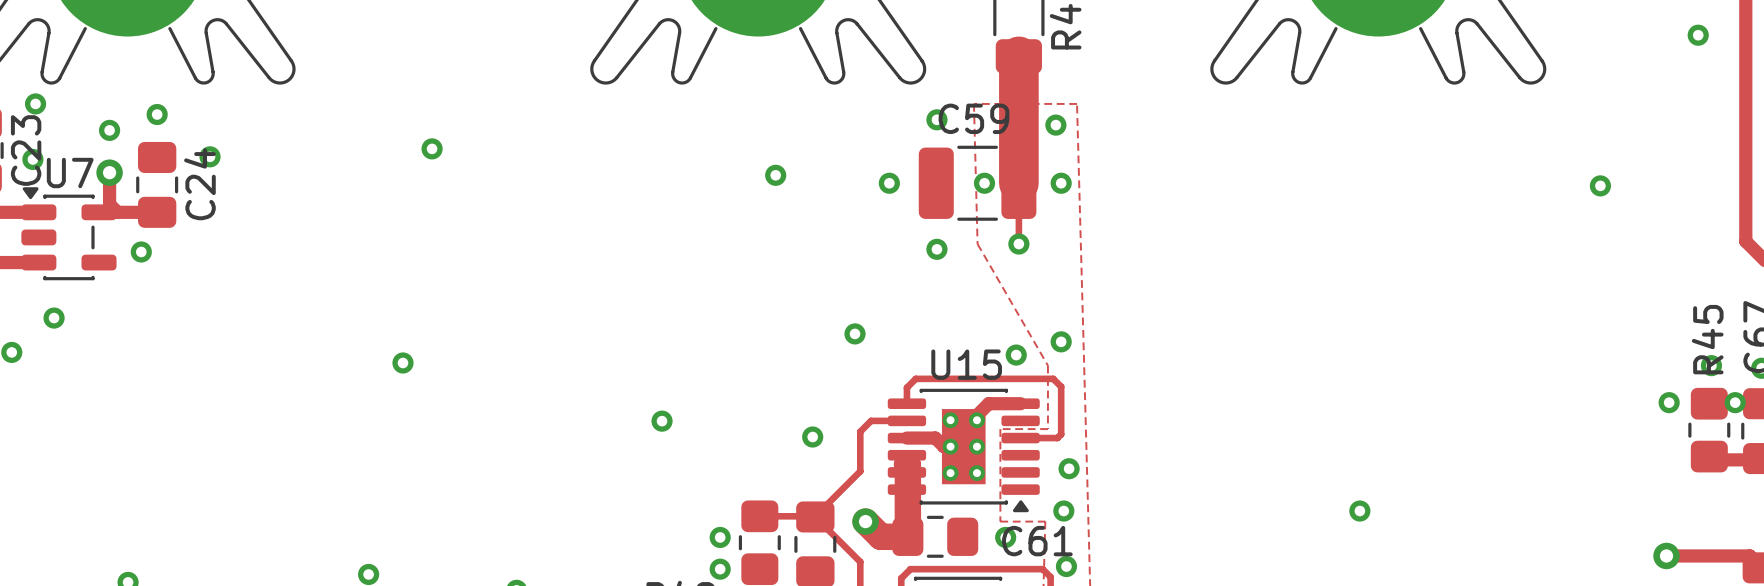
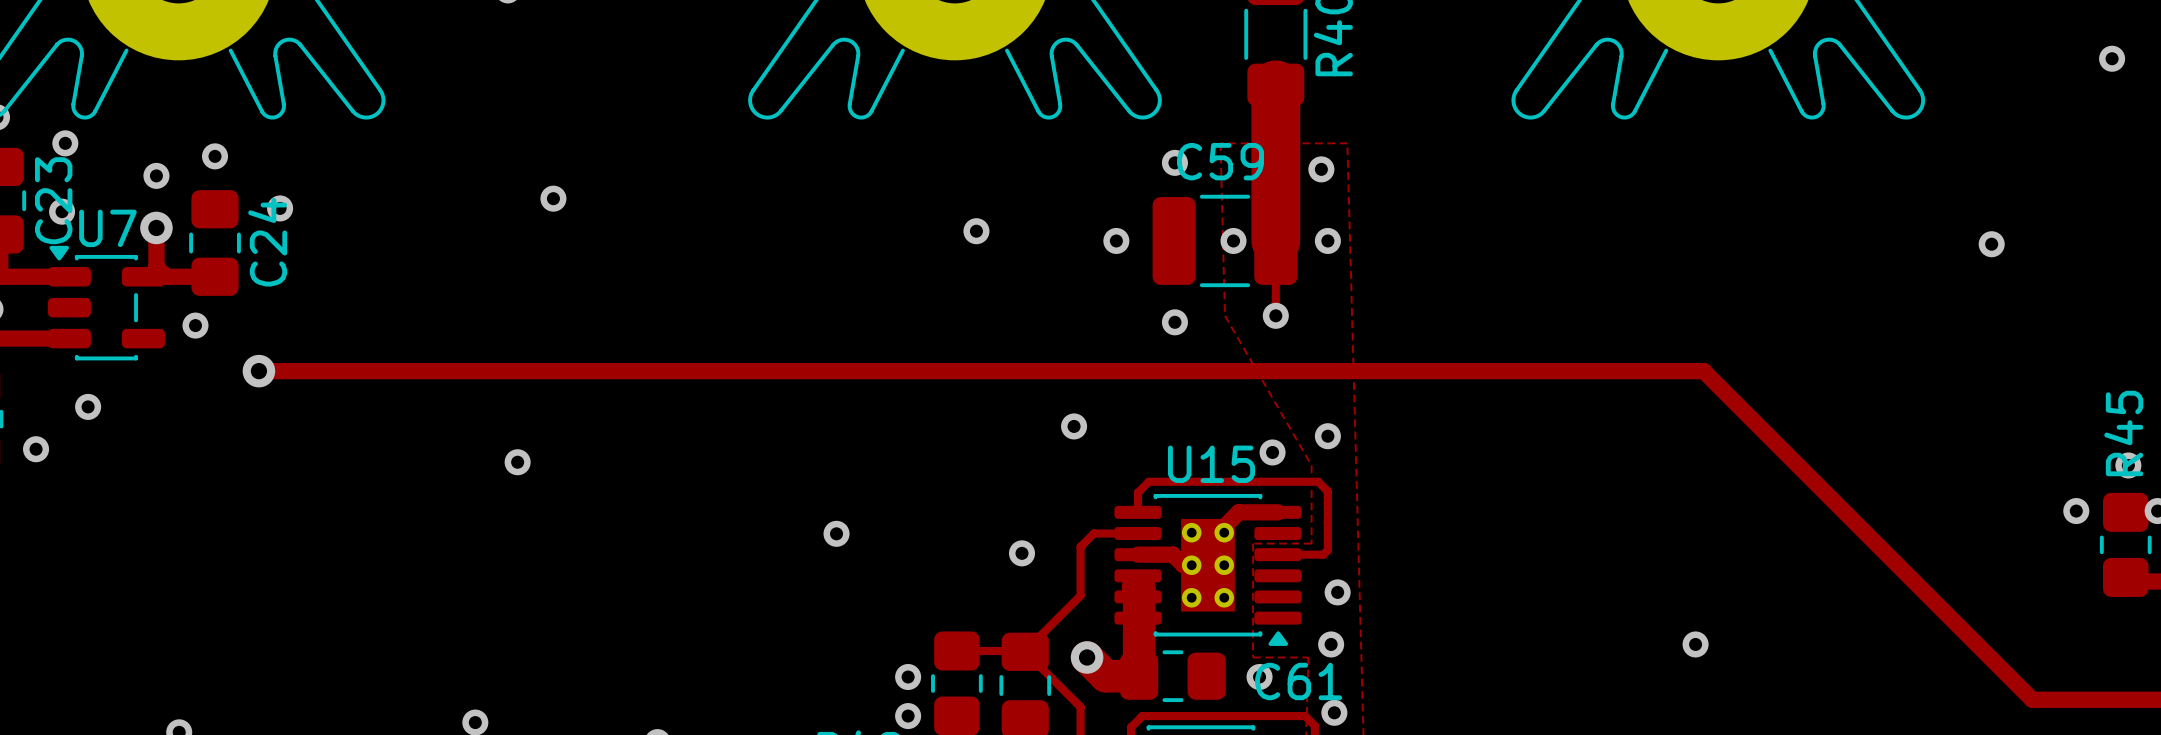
track: none -> (258, 371) (1703, 371) (2032, 699) (2073, 699)
via: none -> (258, 371)
via: (1666, 555) -> none

